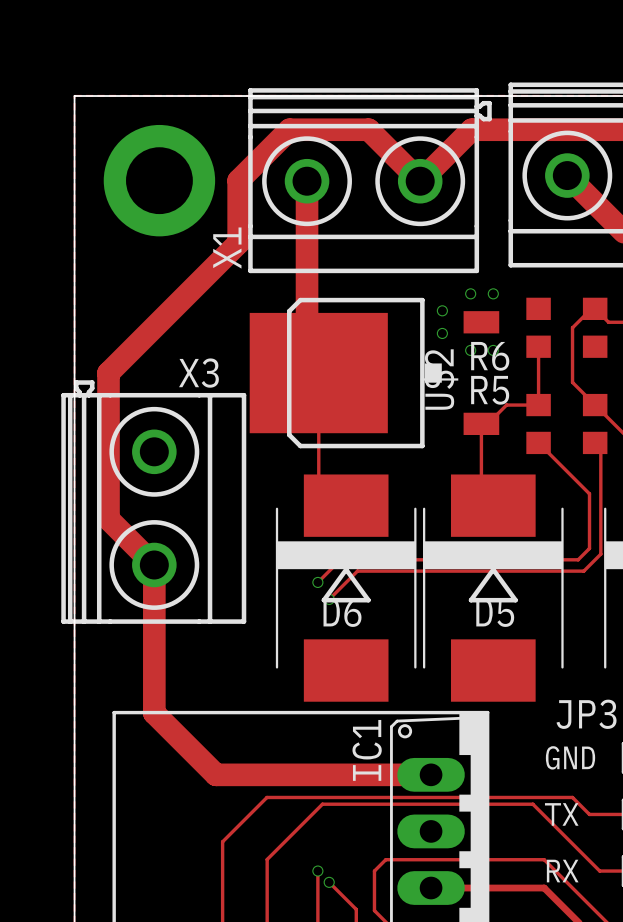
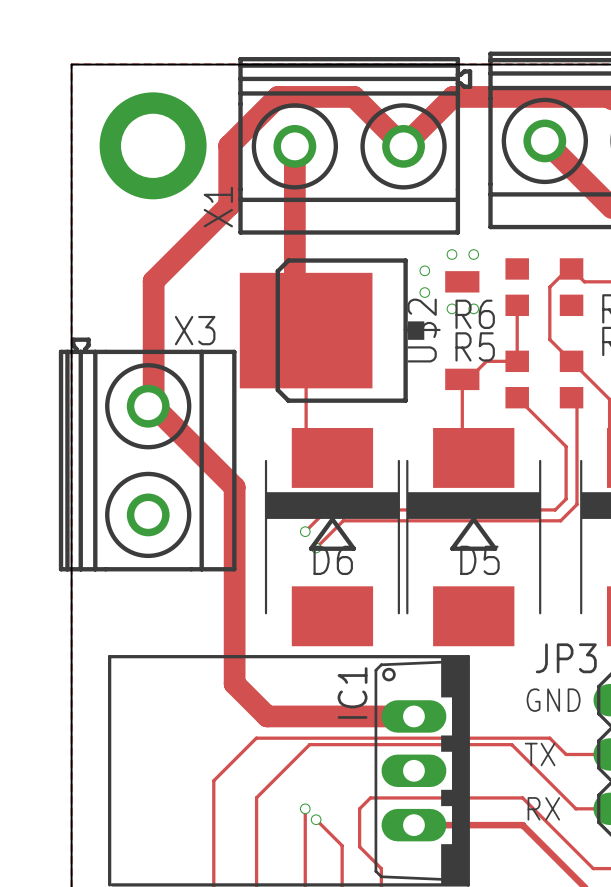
track: (159, 321) (108, 373) (108, 519) (154, 564) (154, 713) (216, 774) (278, 774) -> (153, 281) (153, 406) (234, 487) (234, 683) (267, 716)

